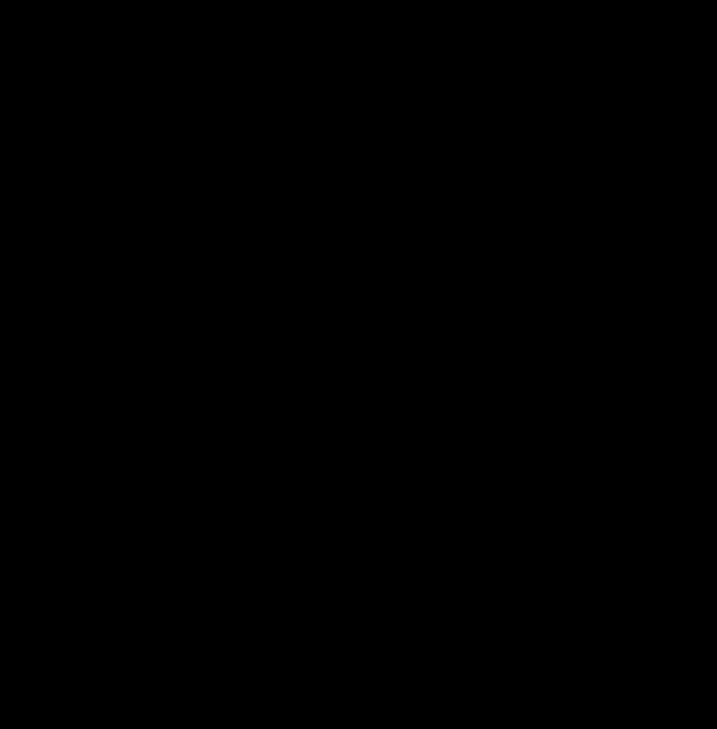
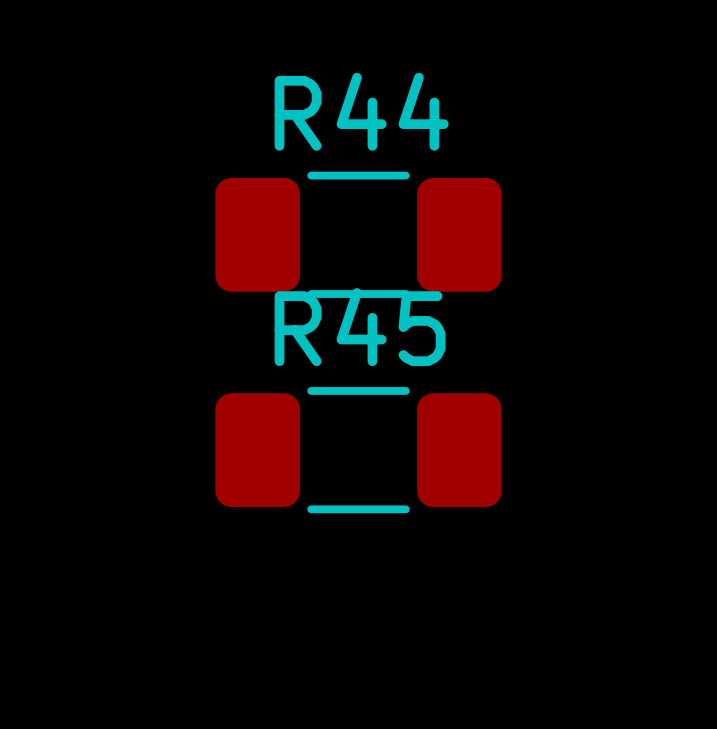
R44: none -> (358, 234)
R45: none -> (358, 450)

